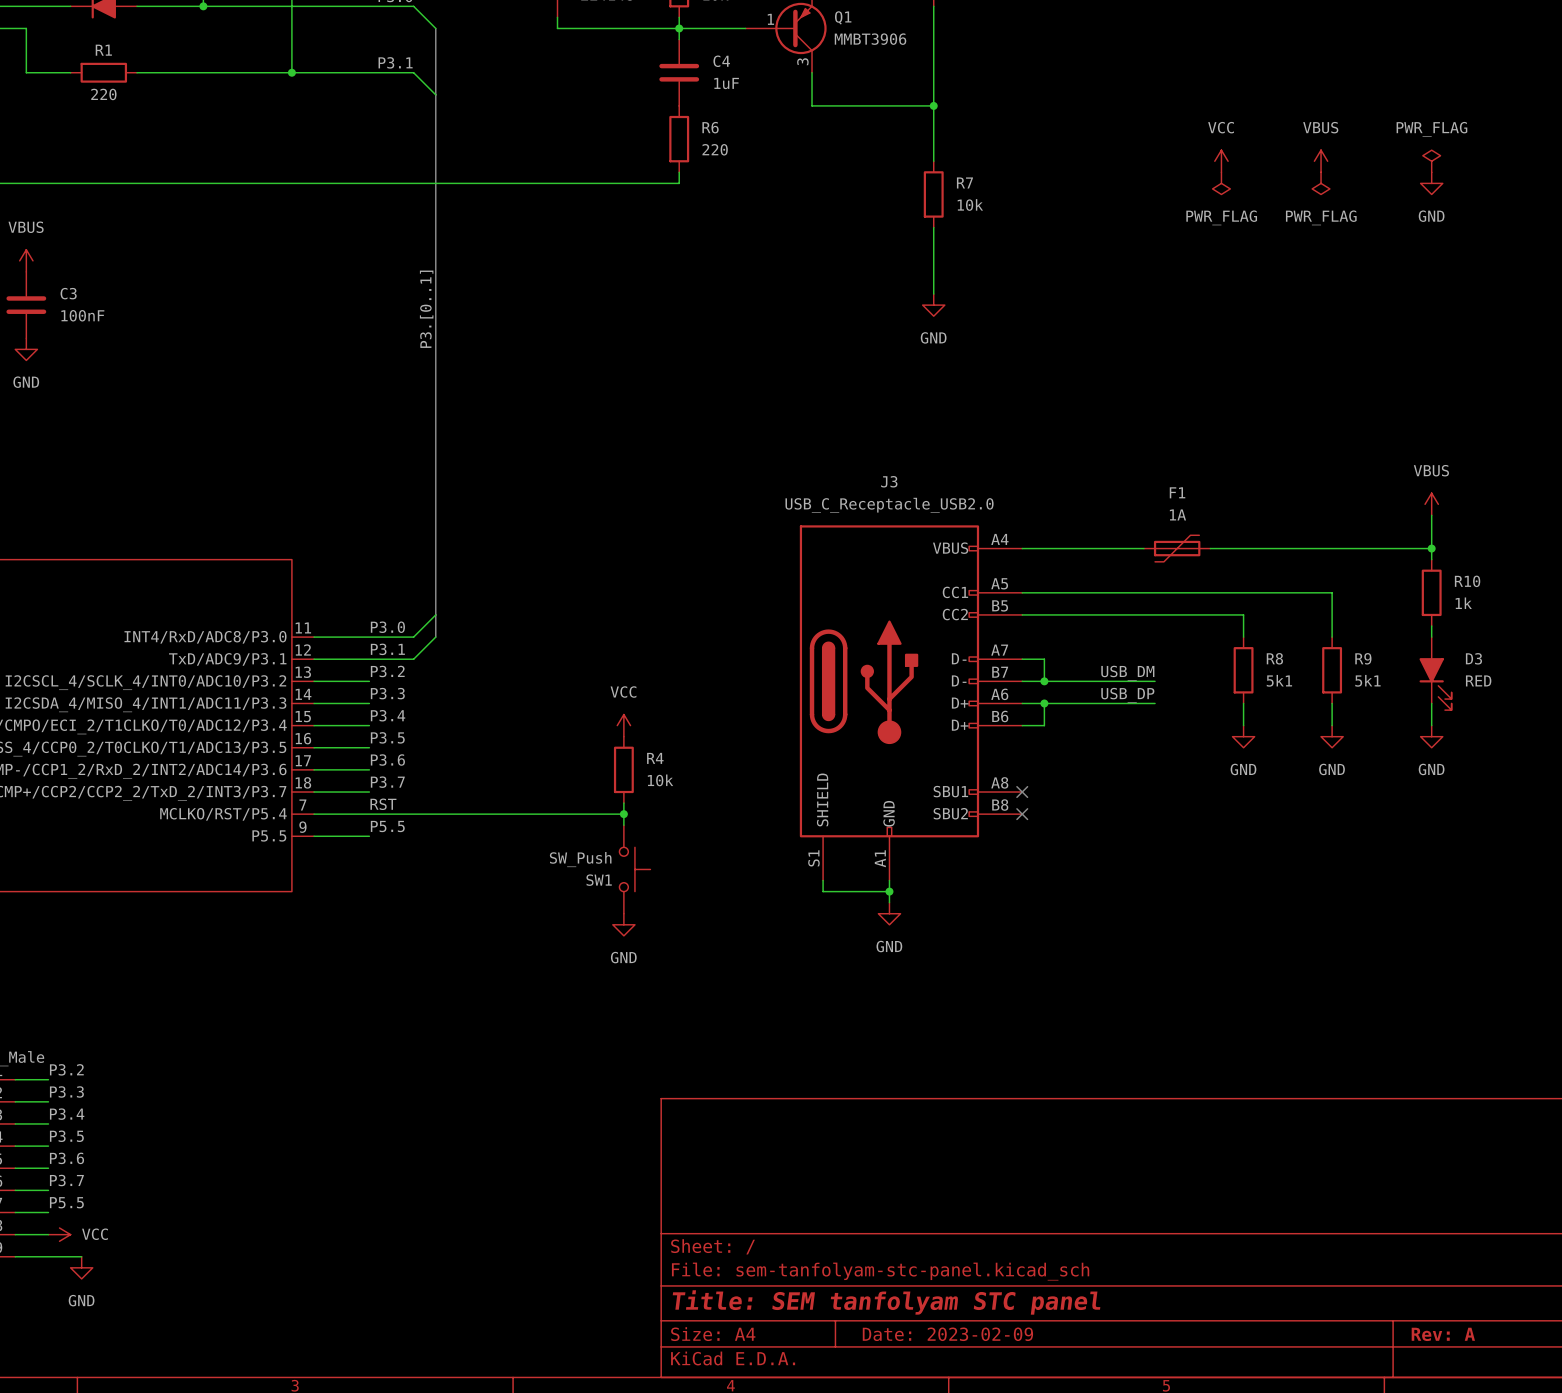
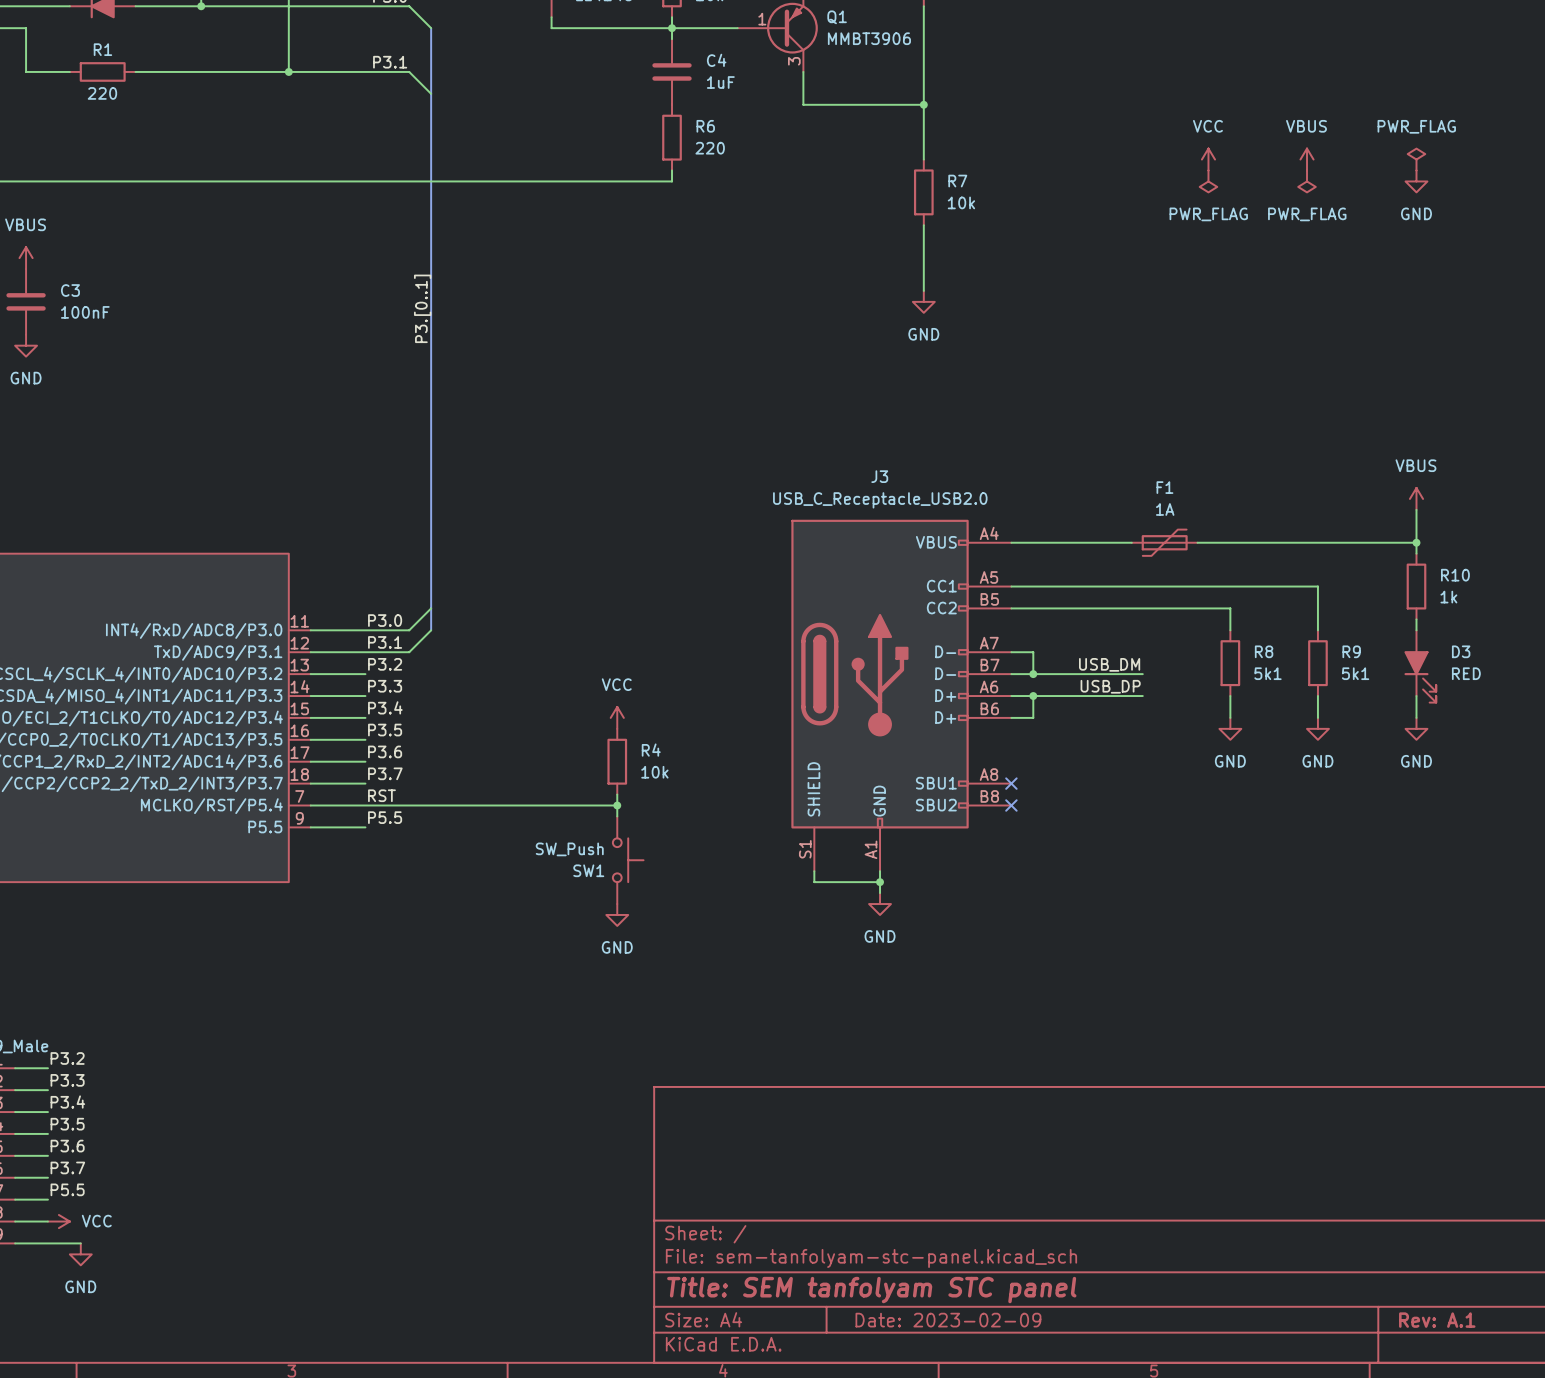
title block: Rev: A (1443, 1334) -> Rev: A.1 (1437, 1320)

